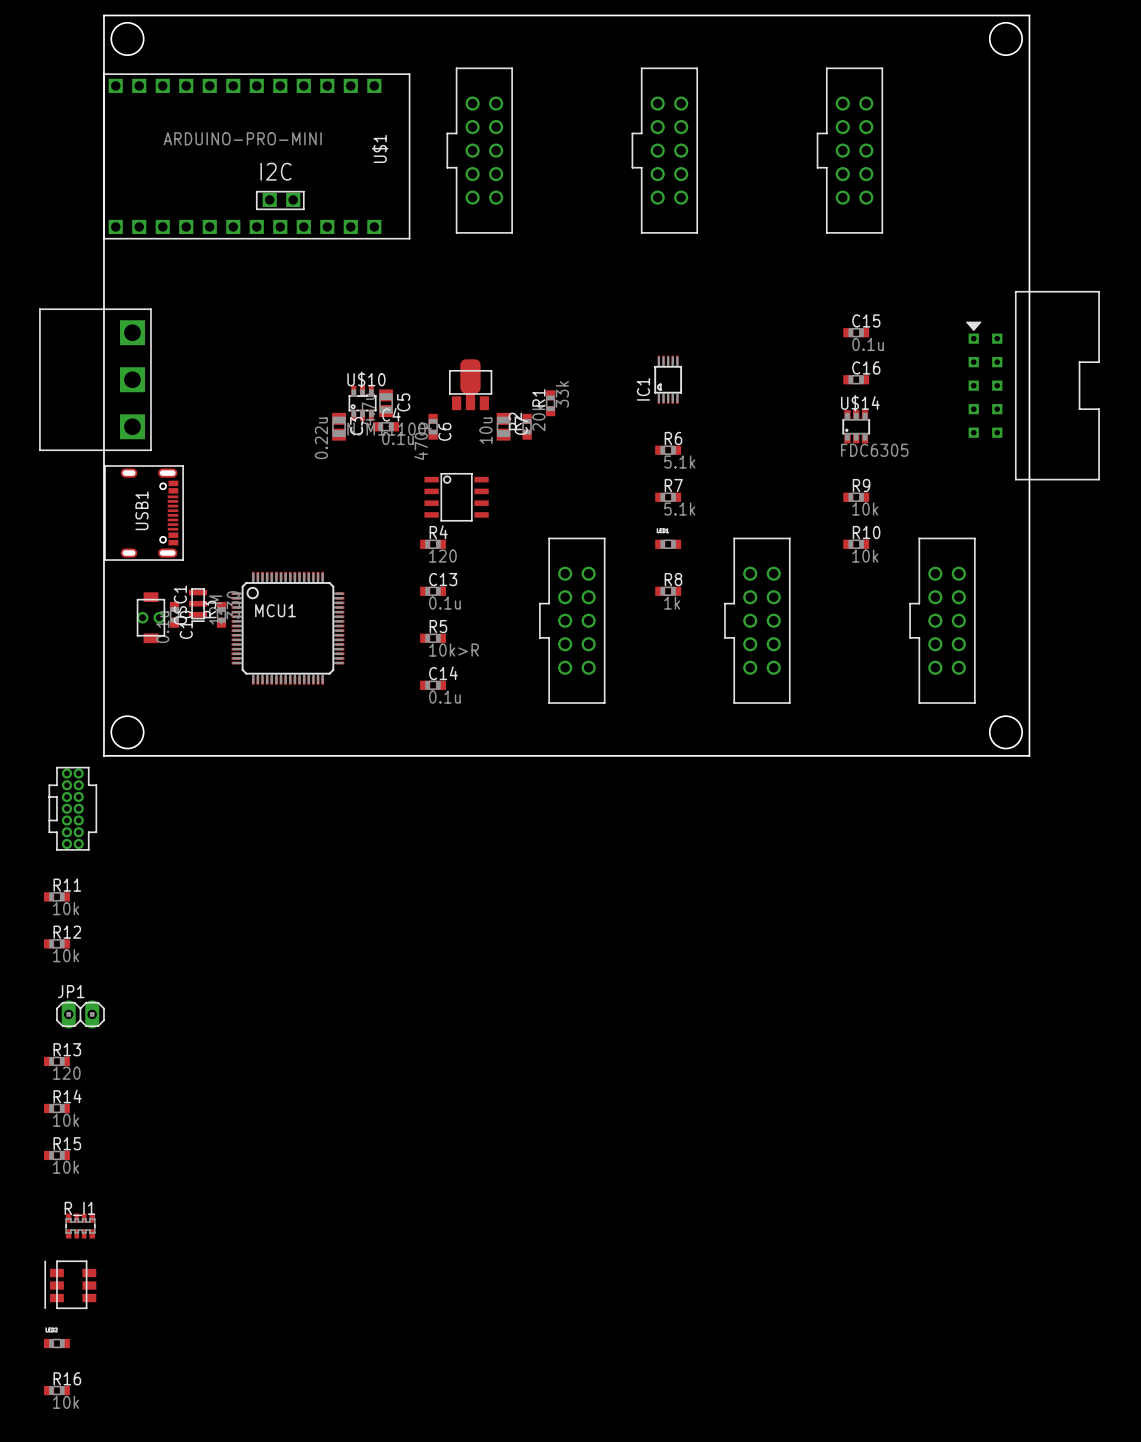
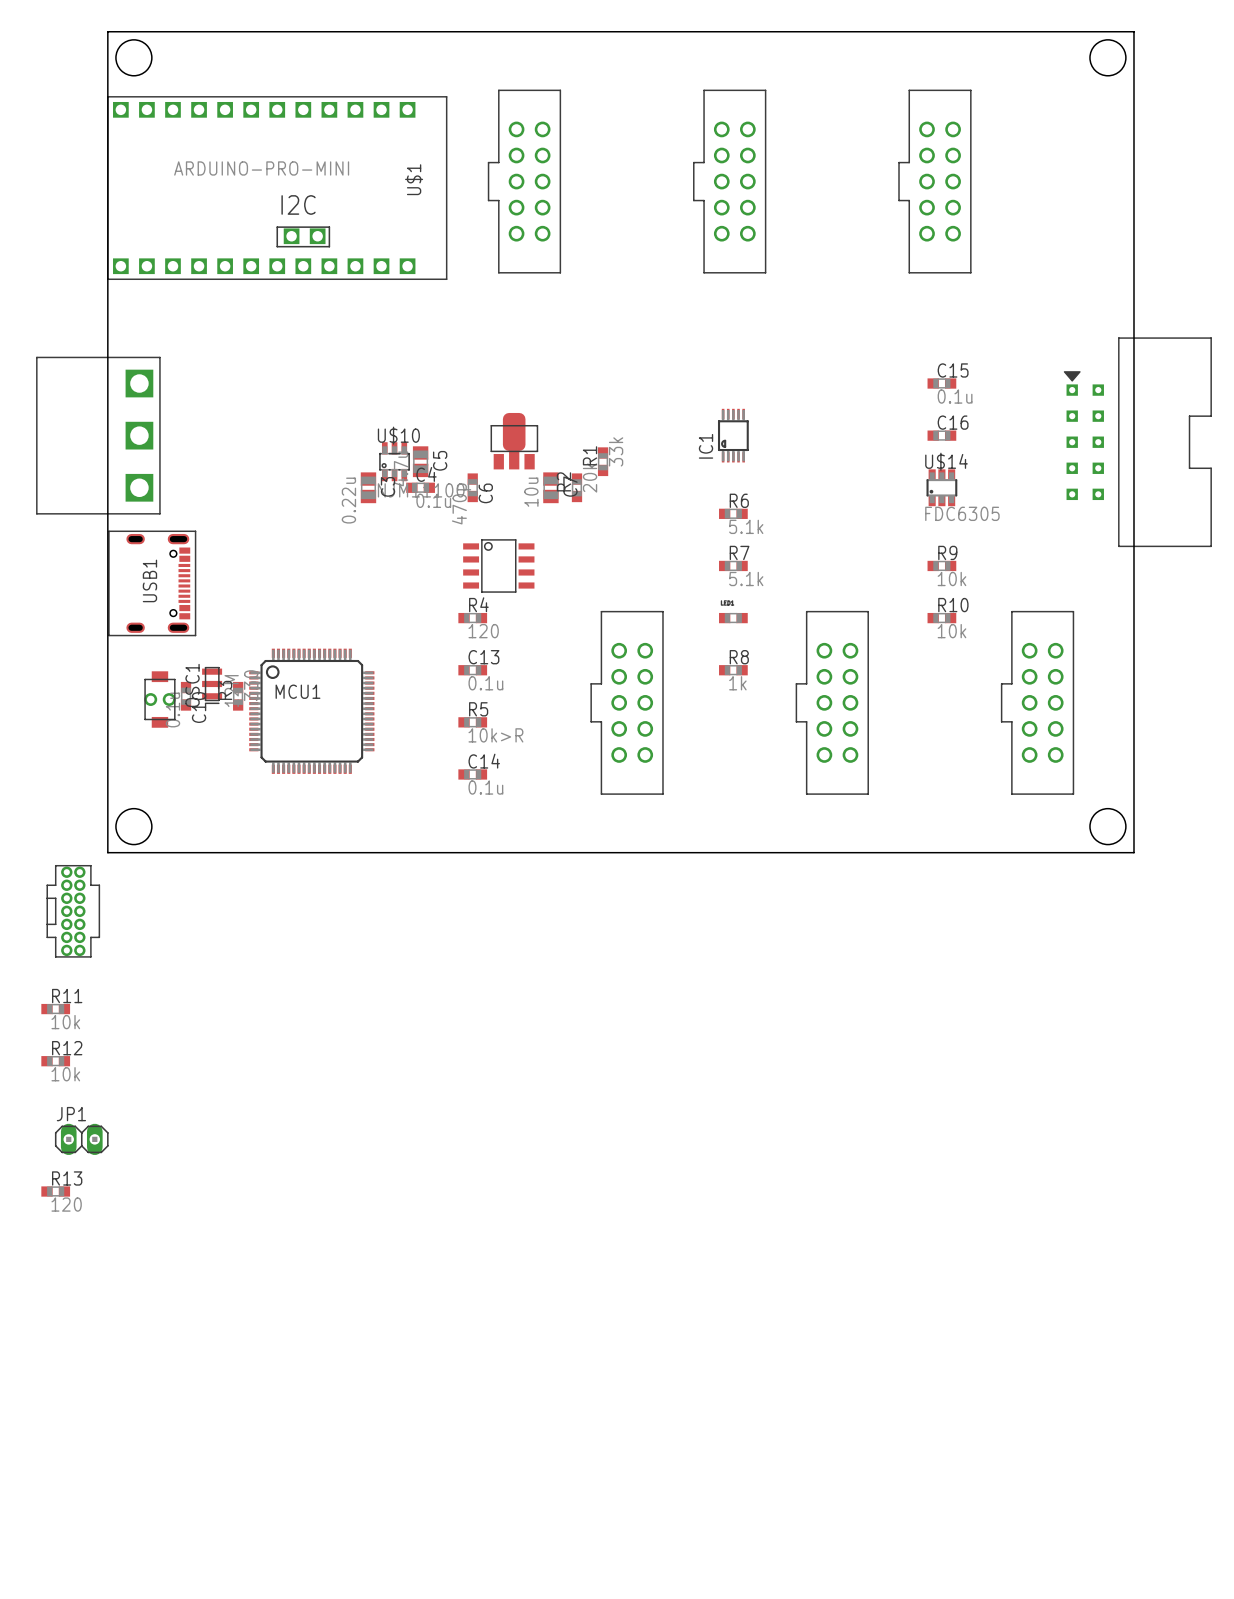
R14: 10k (56, 1108) -> none
R15: 10k (56, 1155) -> none
R_I1: (80, 1226) -> none
part: (70, 1284) -> none
part: (56, 1343) -> none
R16: 10k (56, 1390) -> none

